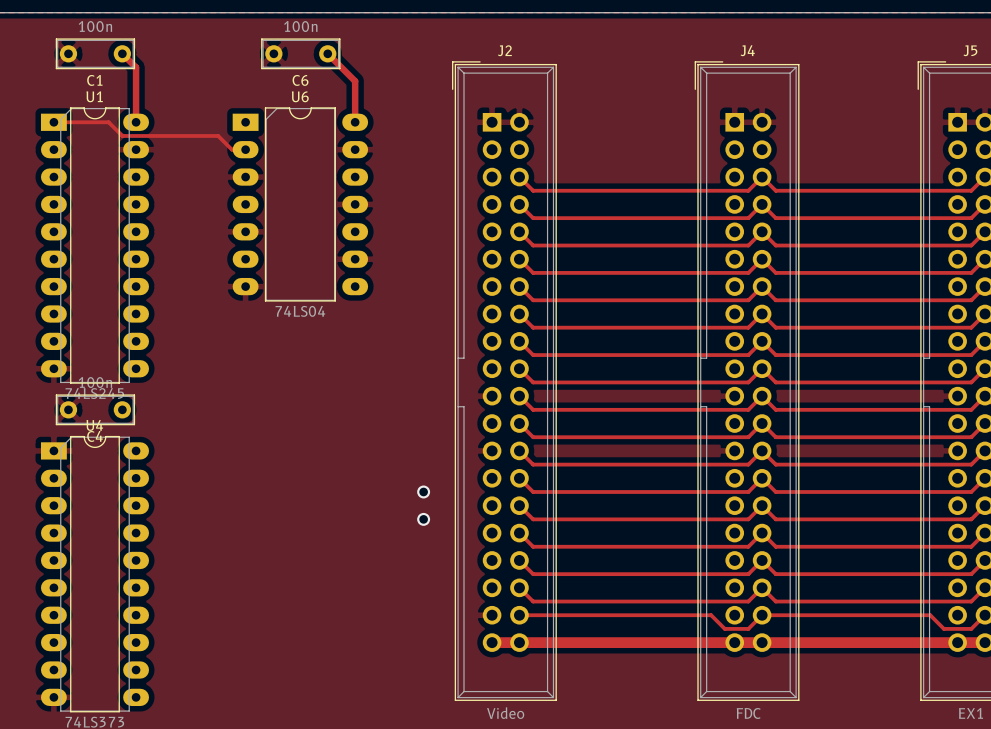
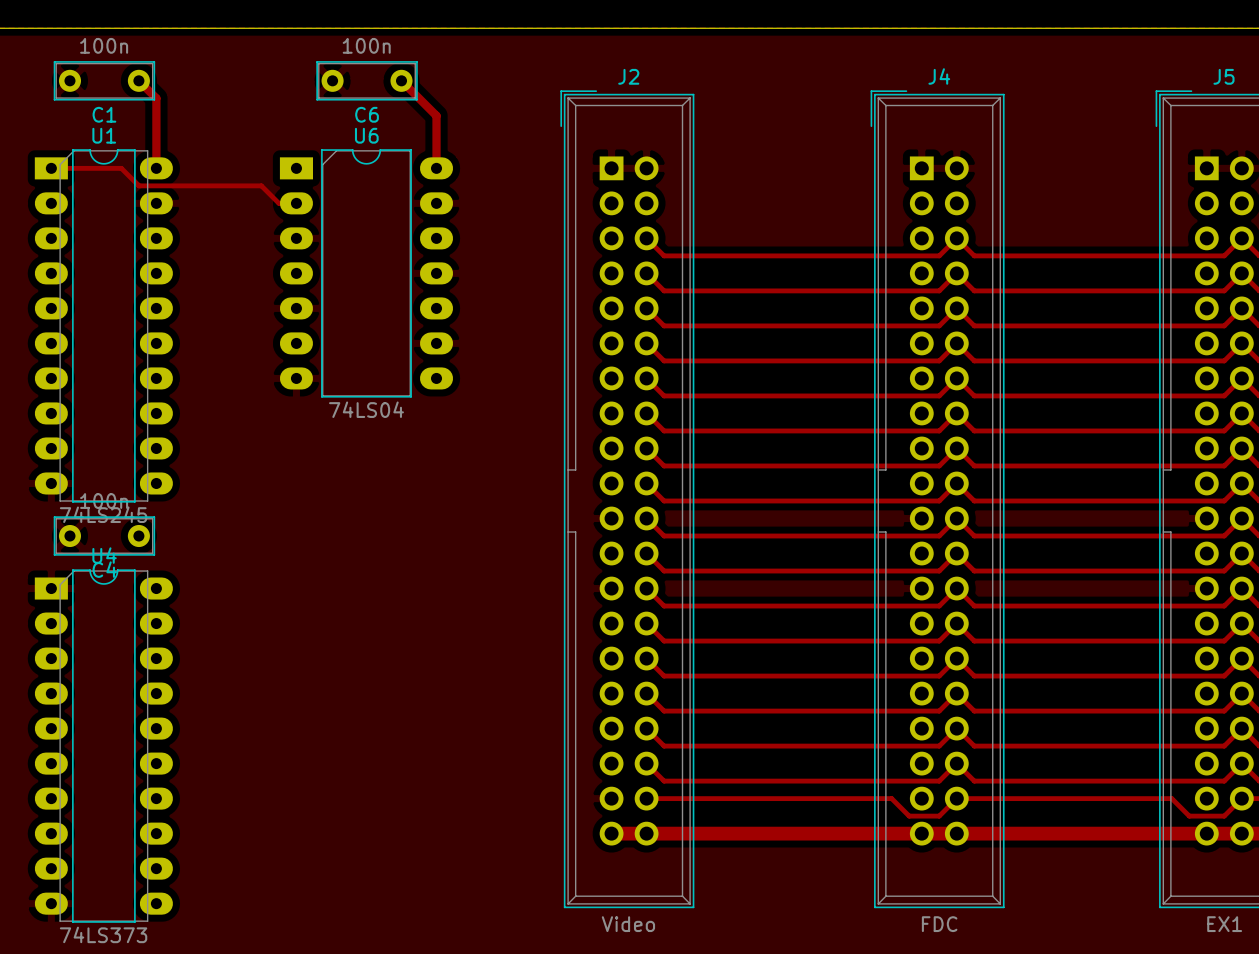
via: (423, 491) -> none
via: (423, 519) -> none

